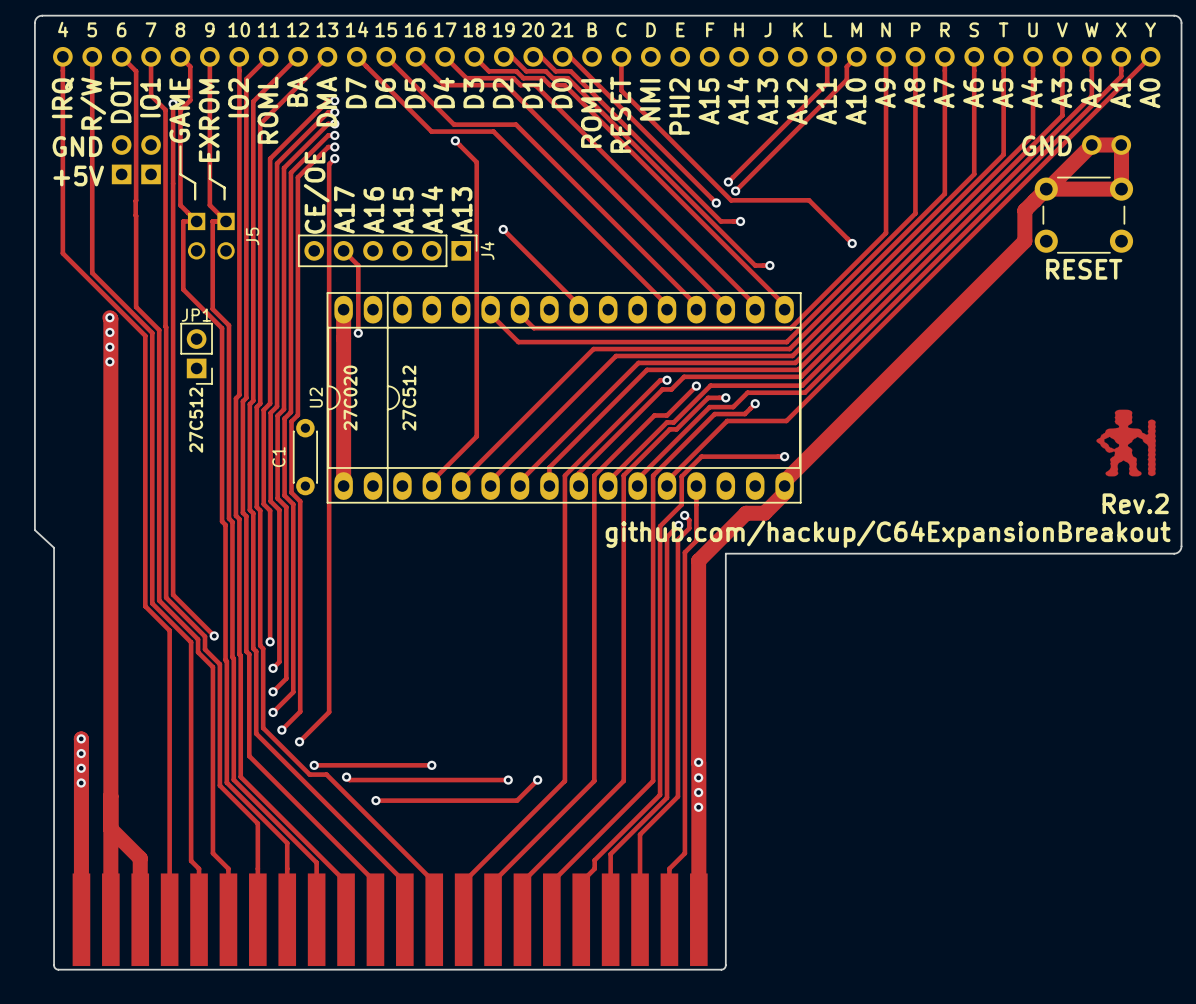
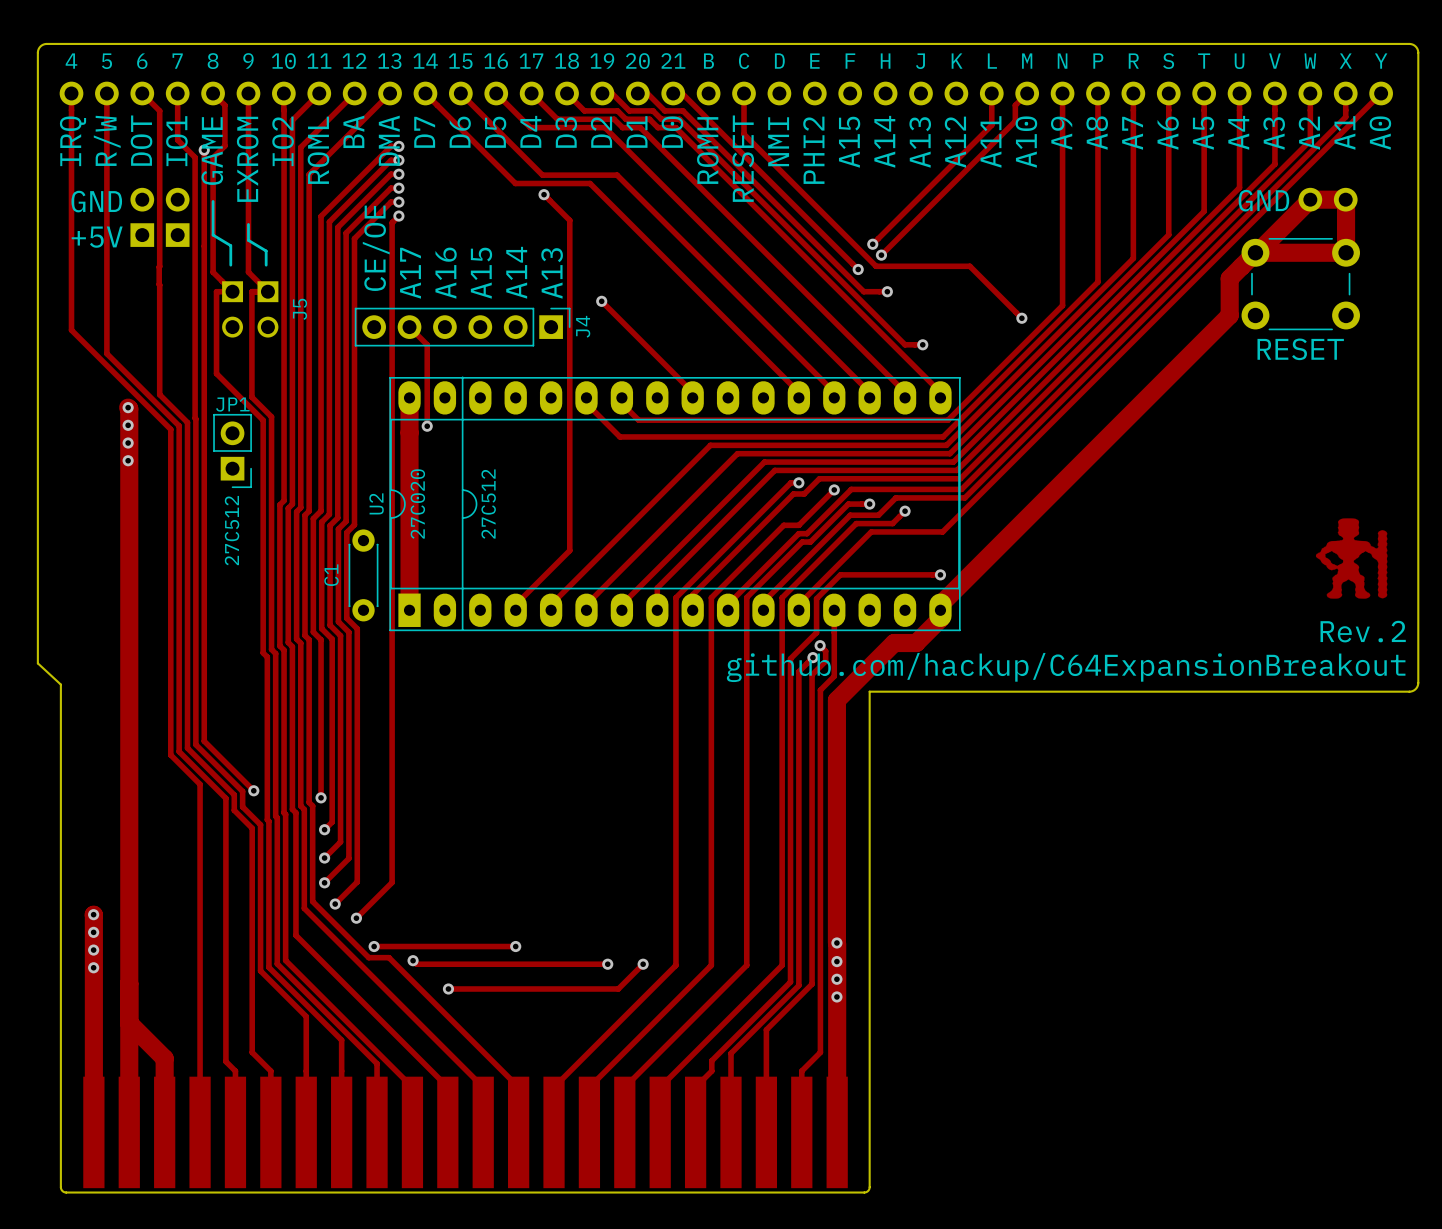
U2 footprint: [326, 291, 802, 504] -> [389, 376, 961, 632]

